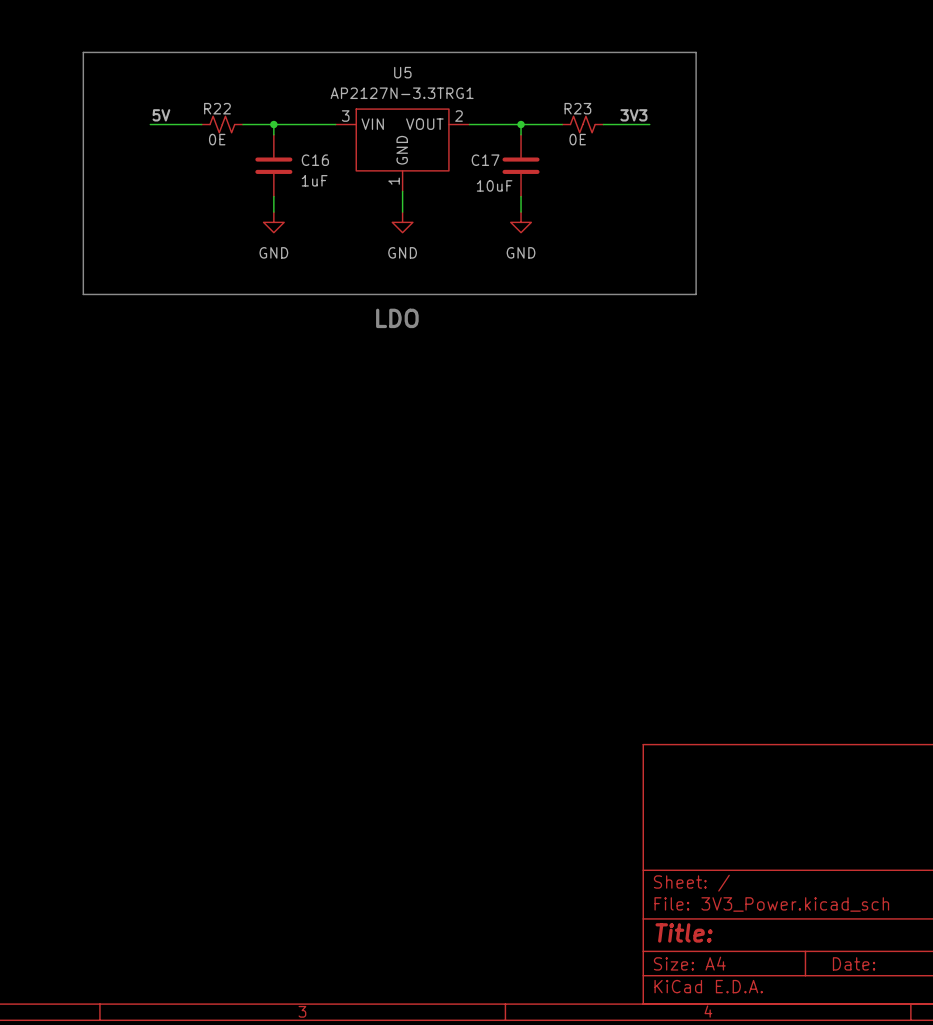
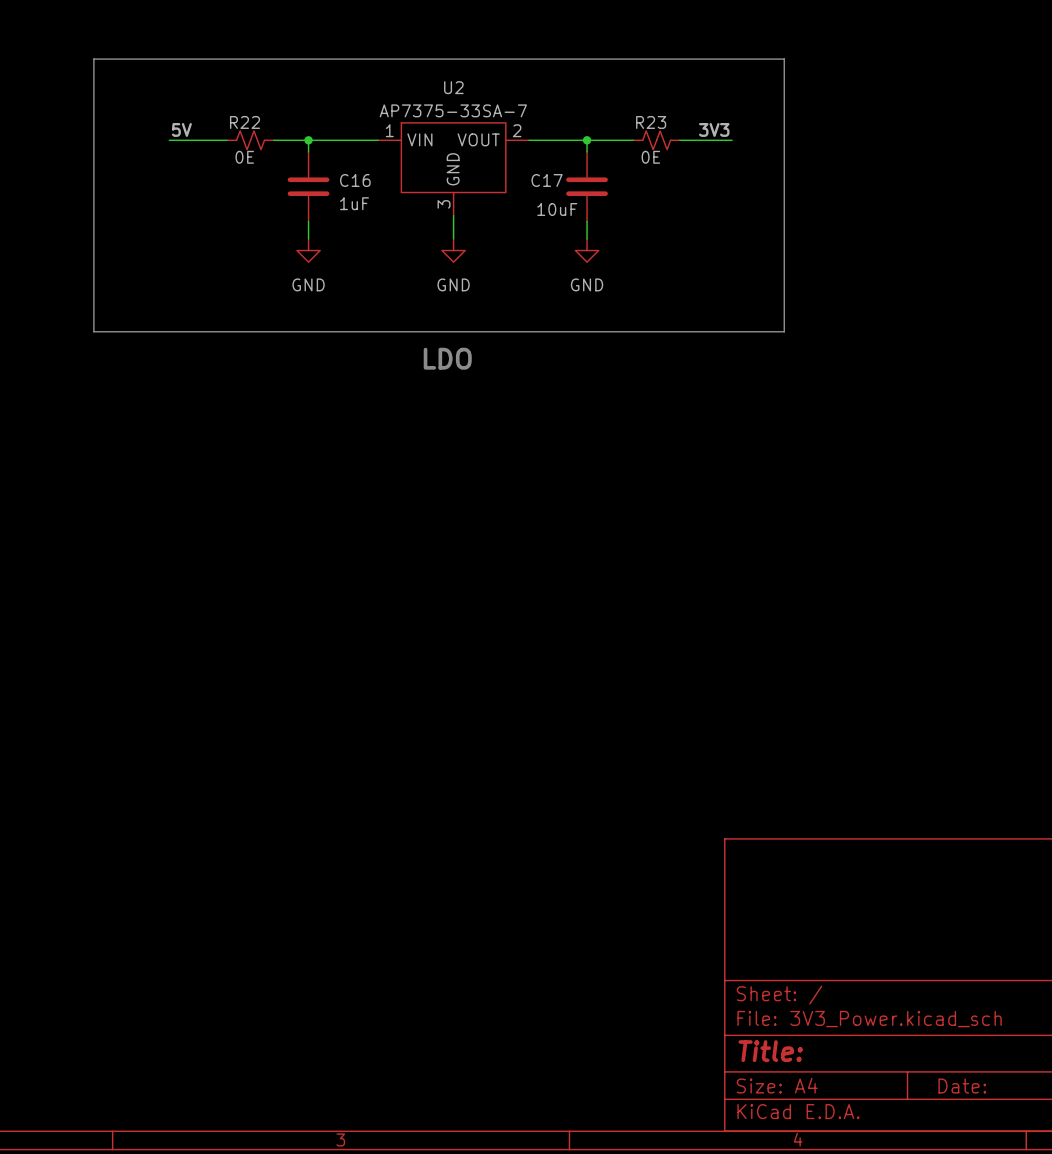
U5 name: U5 (402, 72) -> U2 (453, 87)
U5 value: AP2127N-3.3TRG1 (402, 93) -> AP7375-33SA-7 (453, 110)
U5 pin number: 3 (345, 116) -> 1 (389, 130)
U5 pin number: 1 (394, 181) -> 3 (444, 204)

